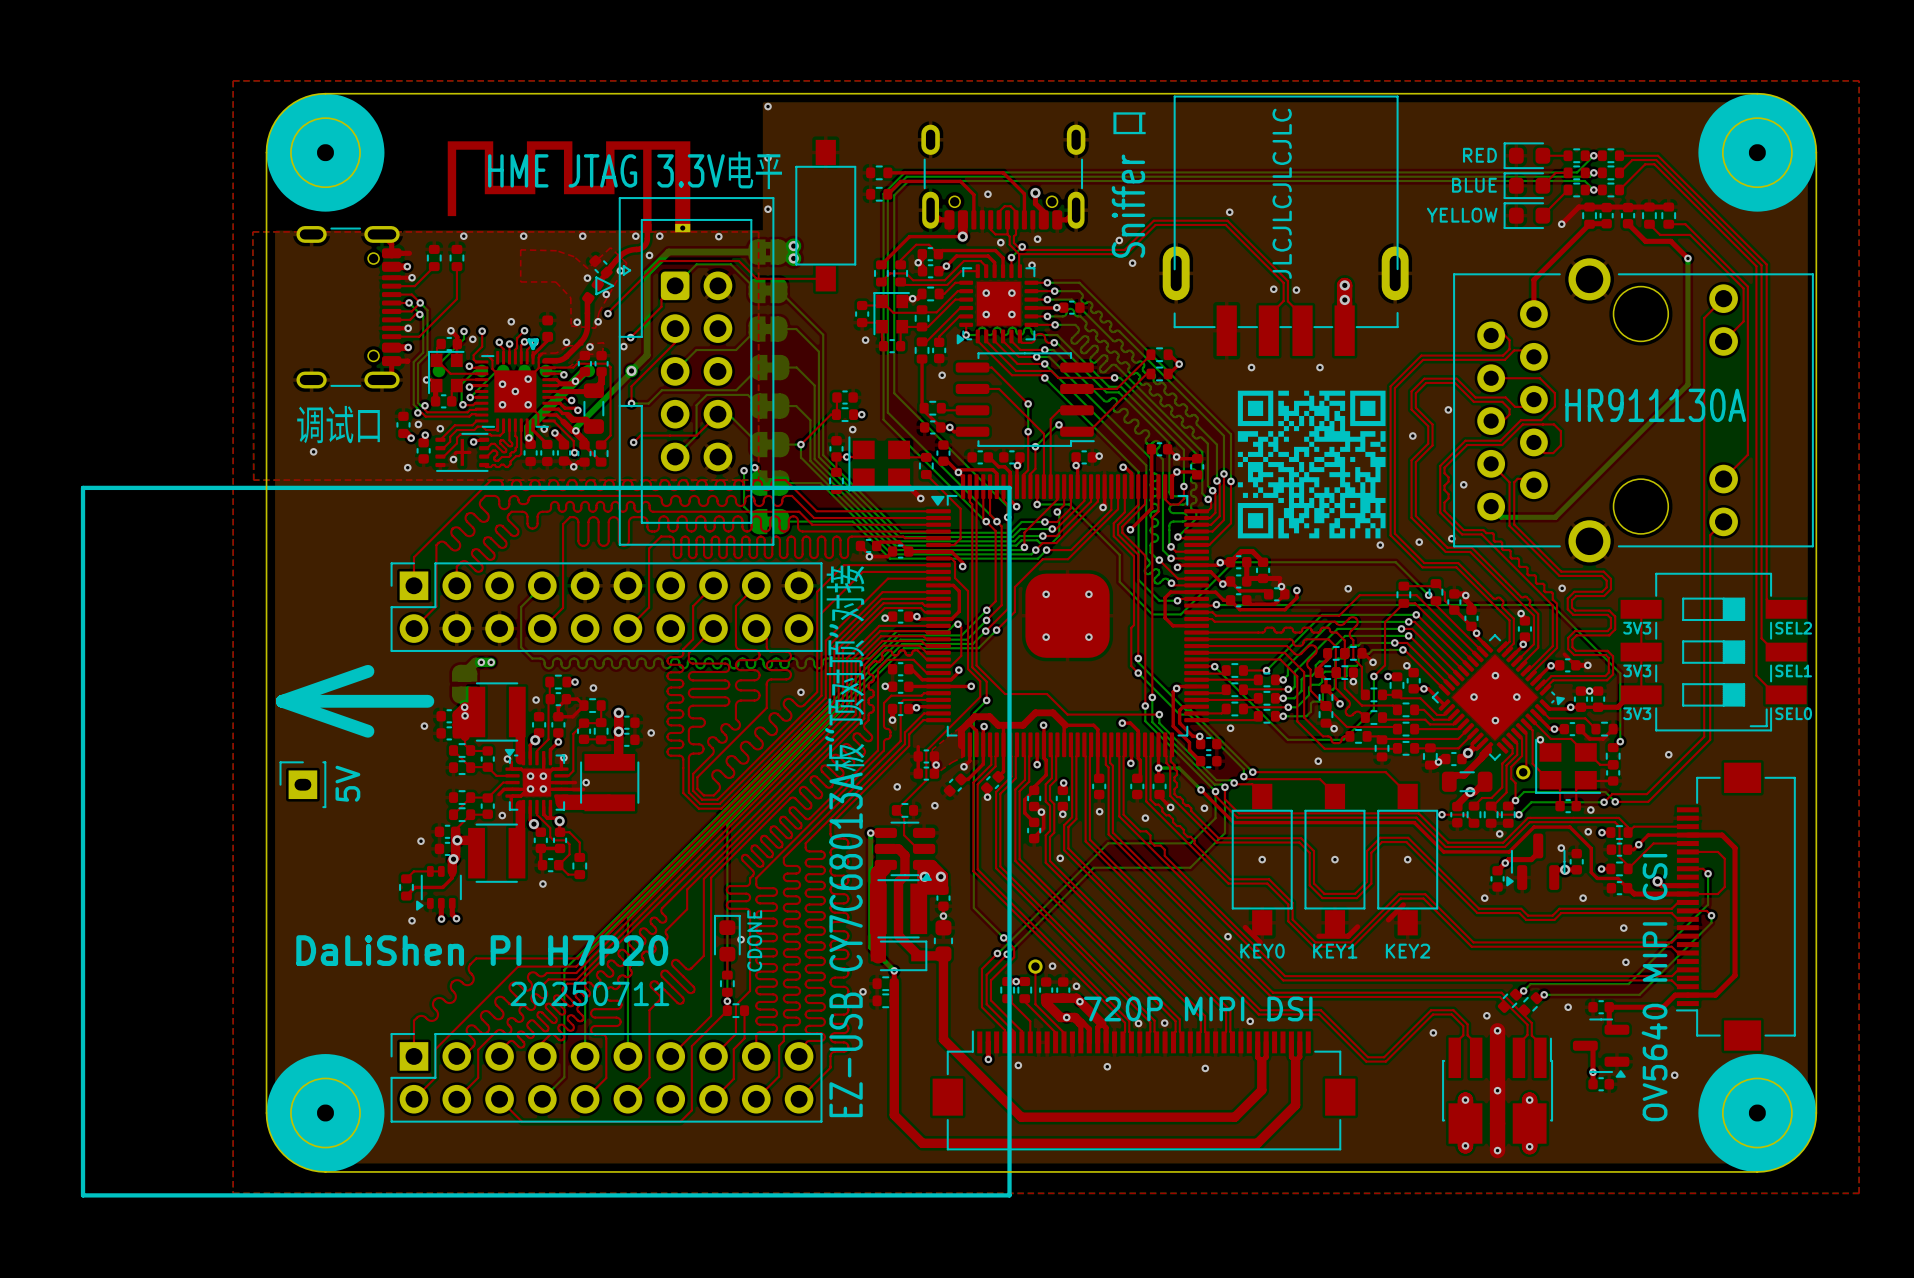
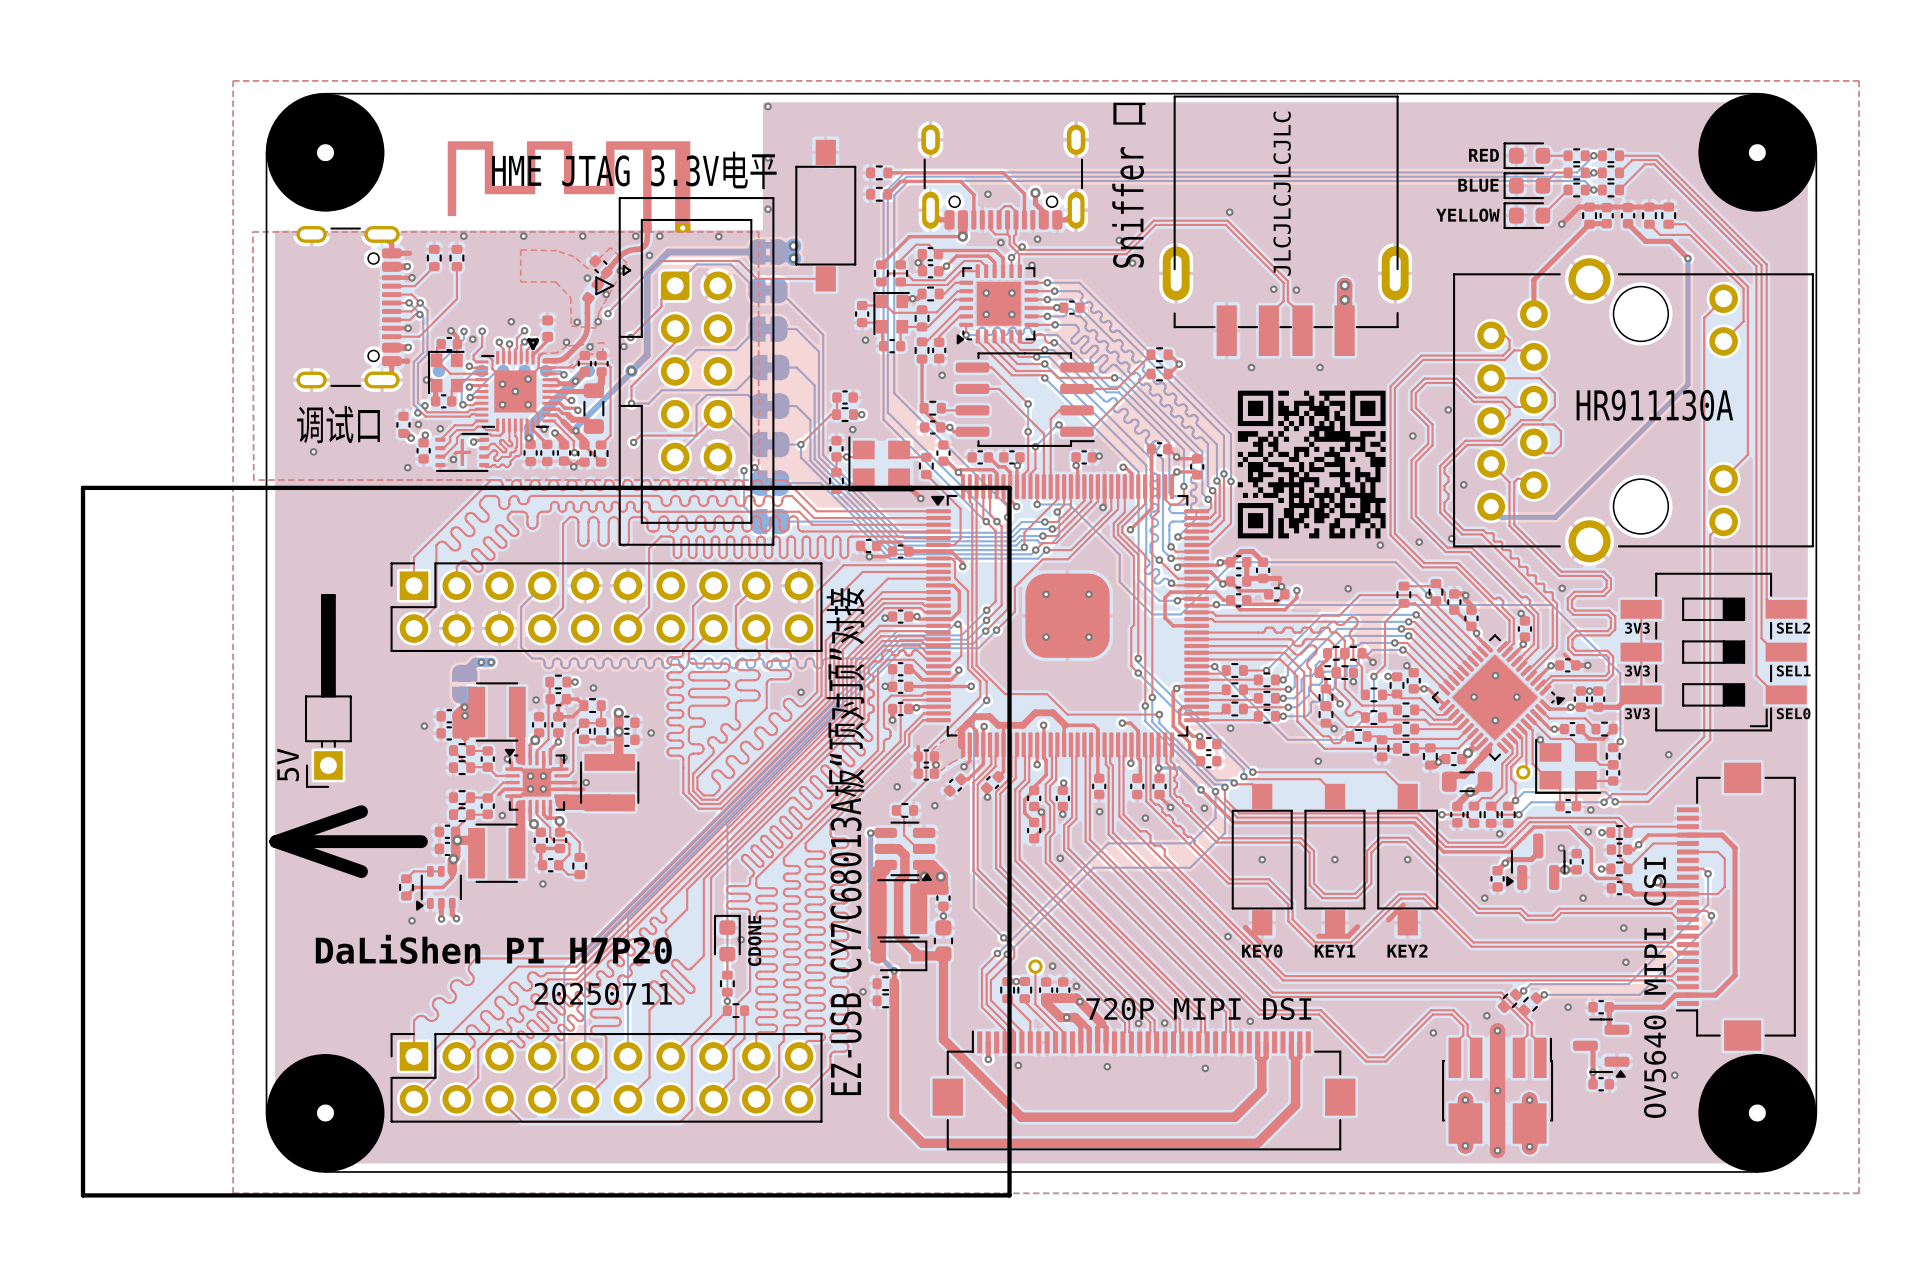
line: (367, 671) (282, 701) -> (361, 811) (275, 841)
part: none -> (328, 691)
line: (282, 701) (427, 701) -> (275, 841) (421, 841)
line: (282, 701) (367, 731) -> (275, 841) (361, 871)
text position: 5V (347, 783) -> 5V (288, 764)
part: (302, 784) -> none

